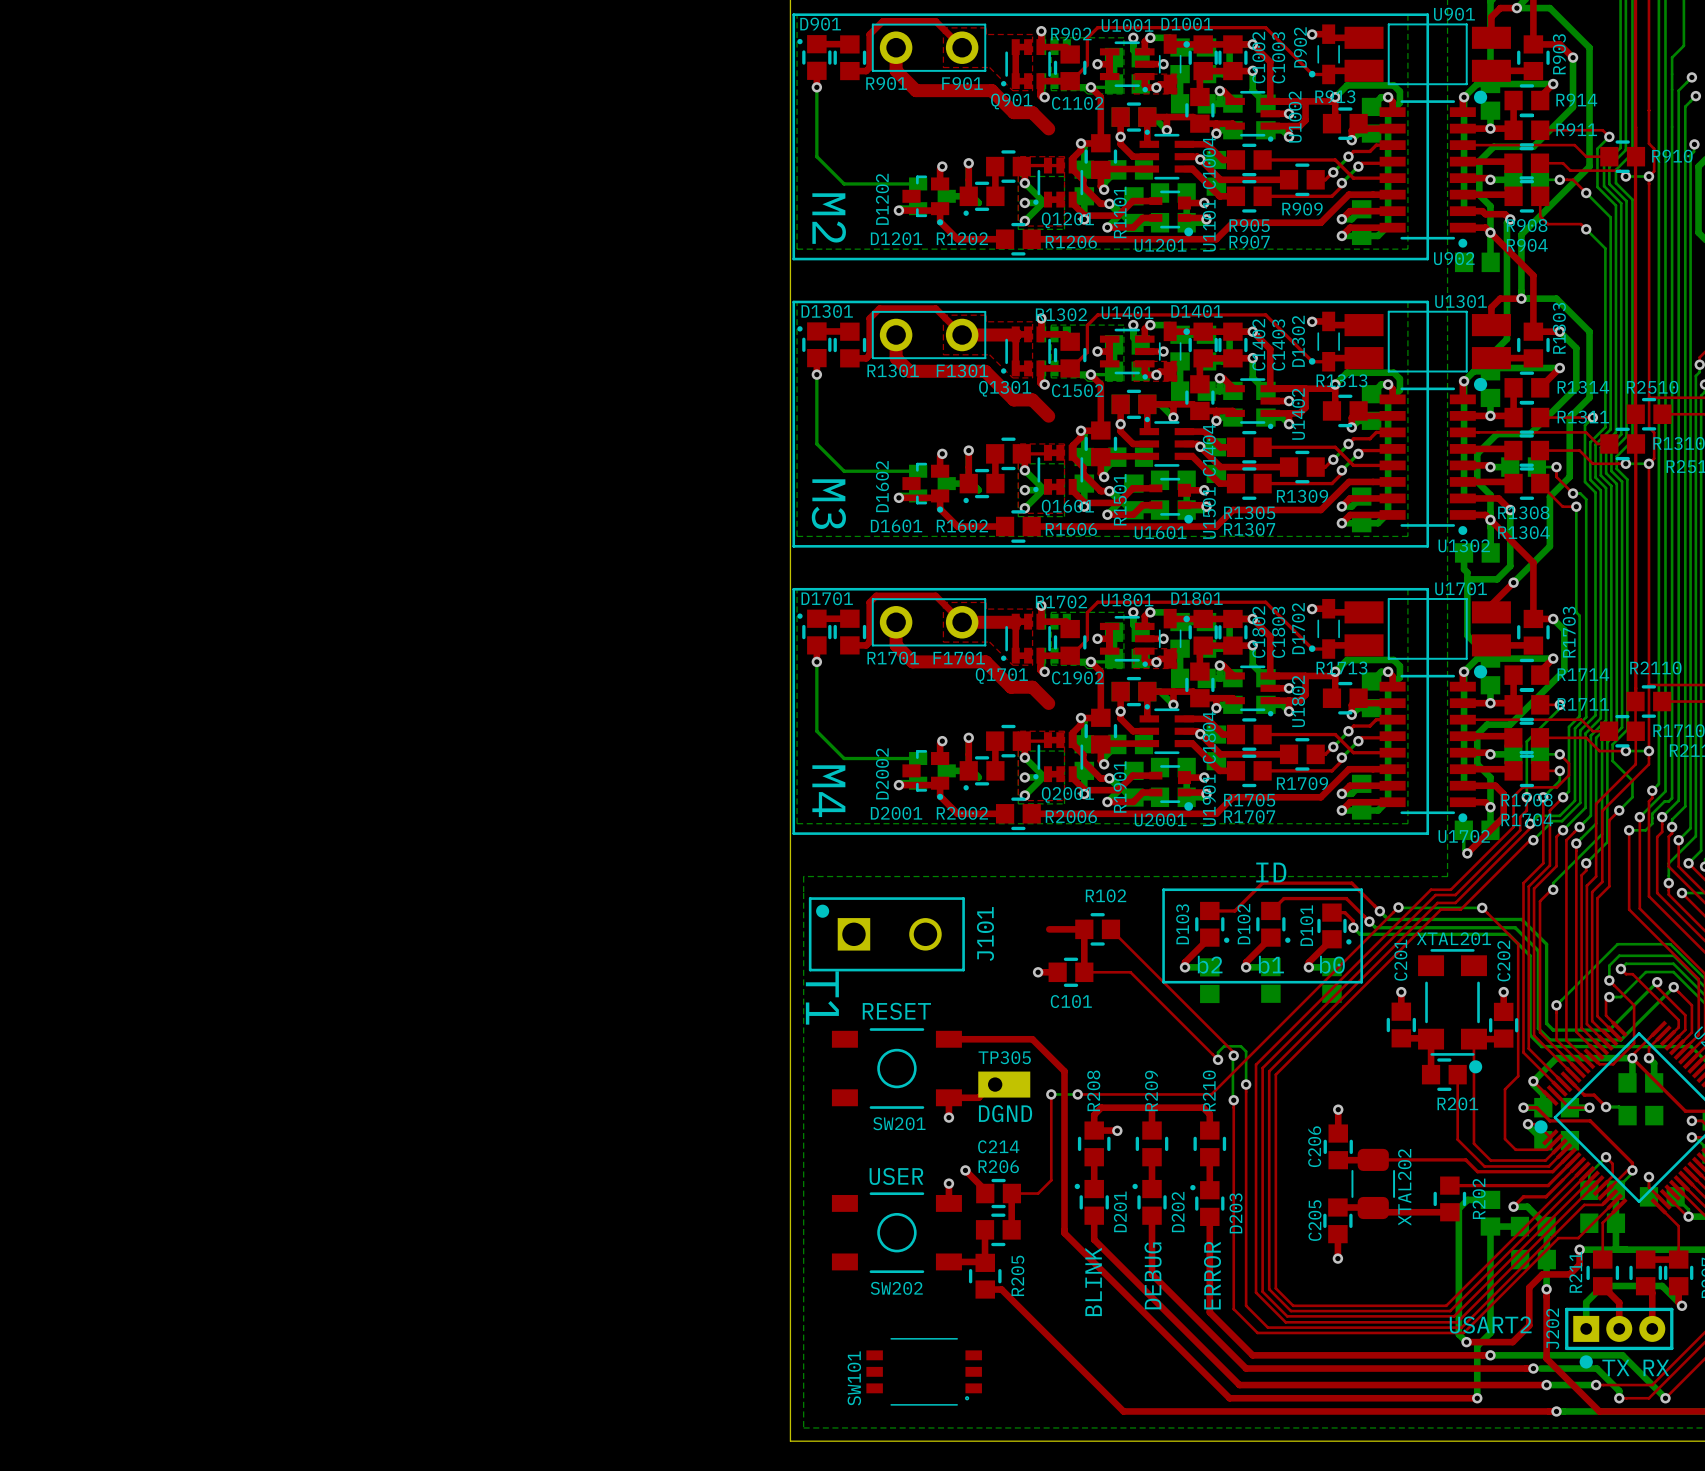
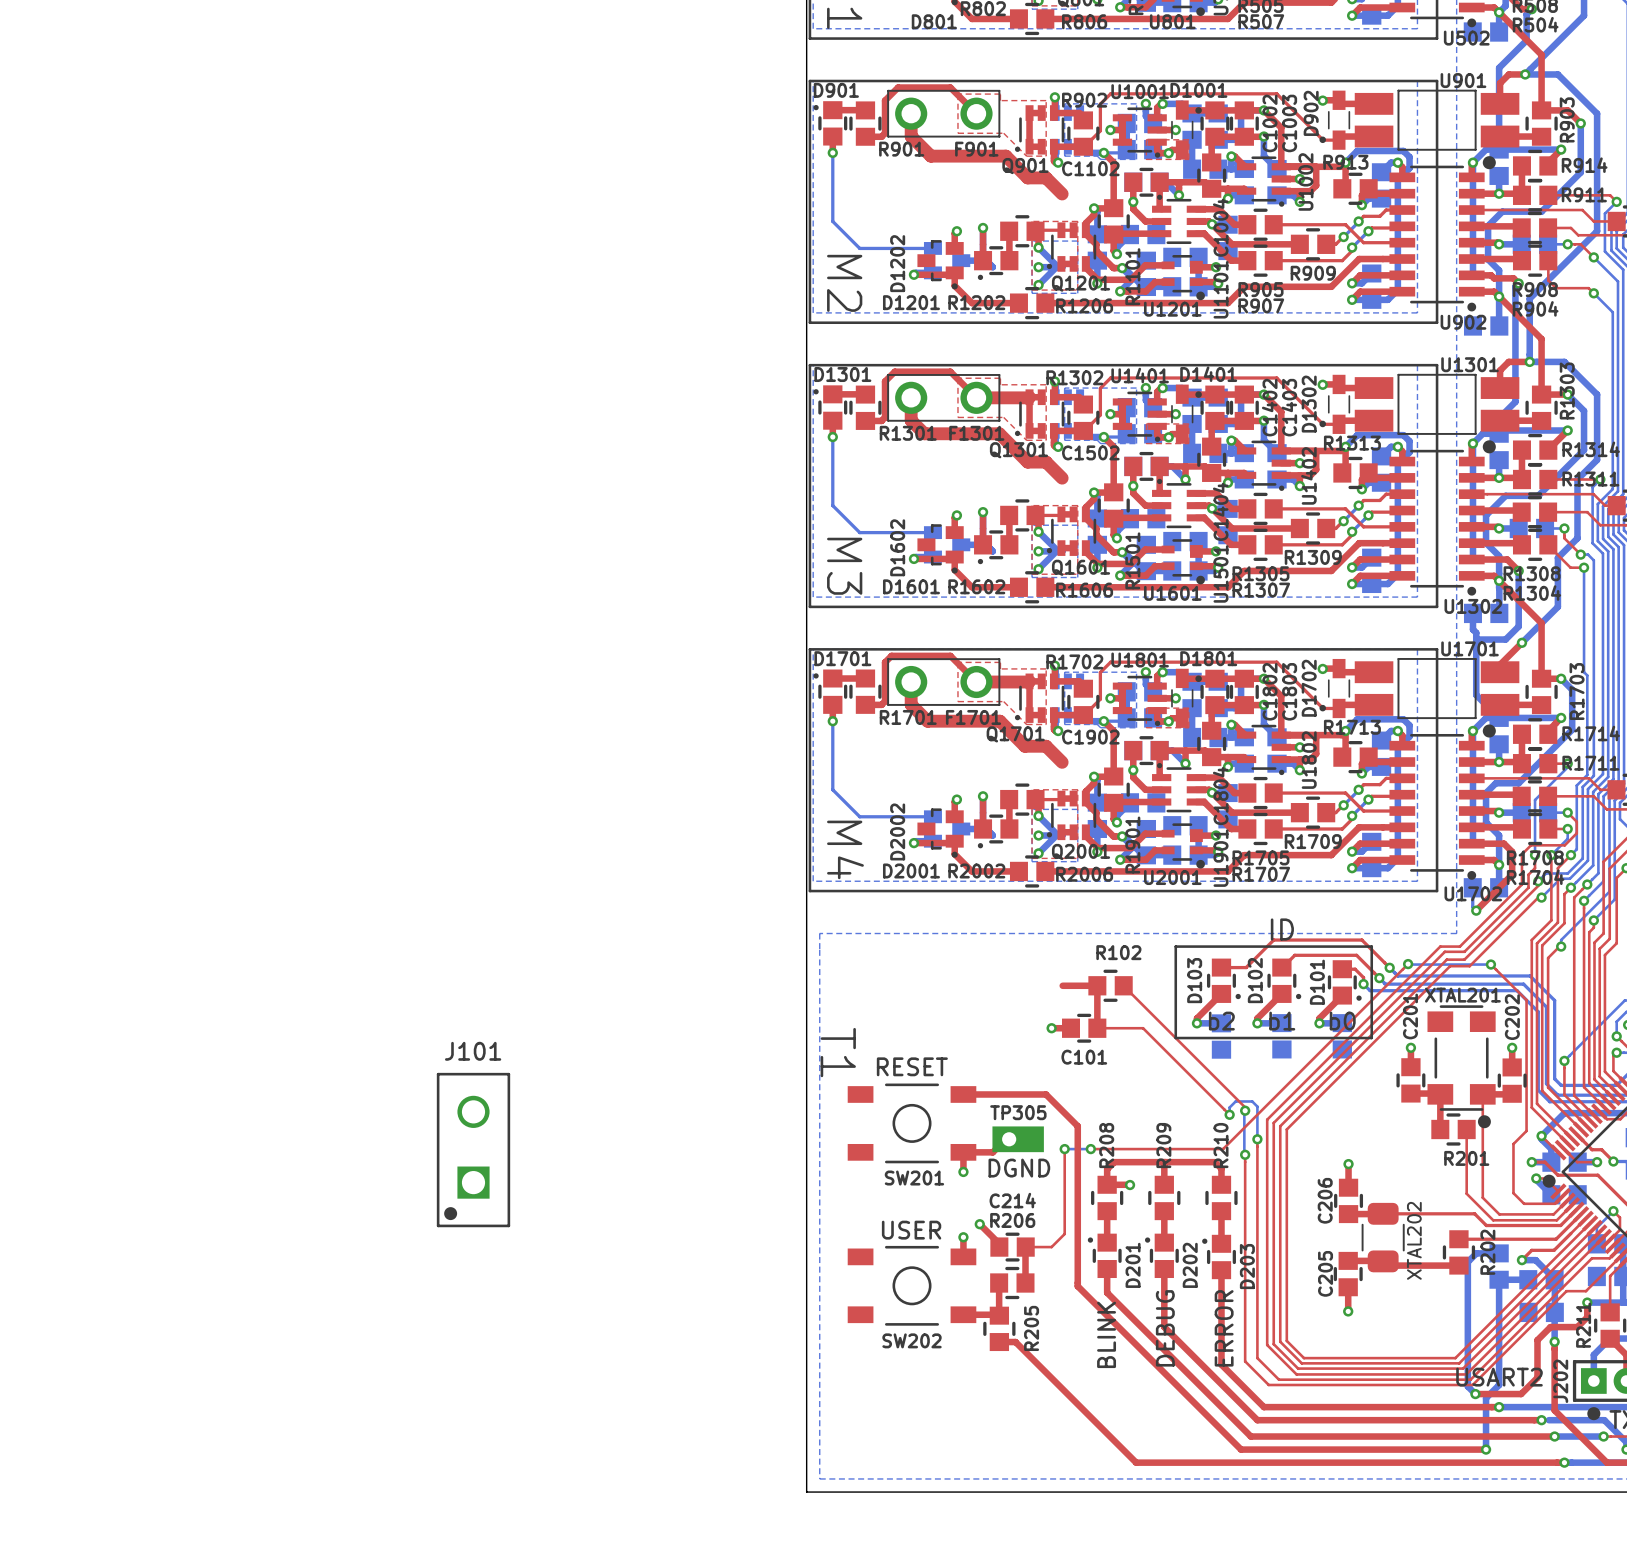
J101 rotation: 0° (886, 934) -> 90° counterclockwise (473, 1150)
J101 position: (886, 934) -> (473, 1150)
SW101: (924, 1371) -> none

